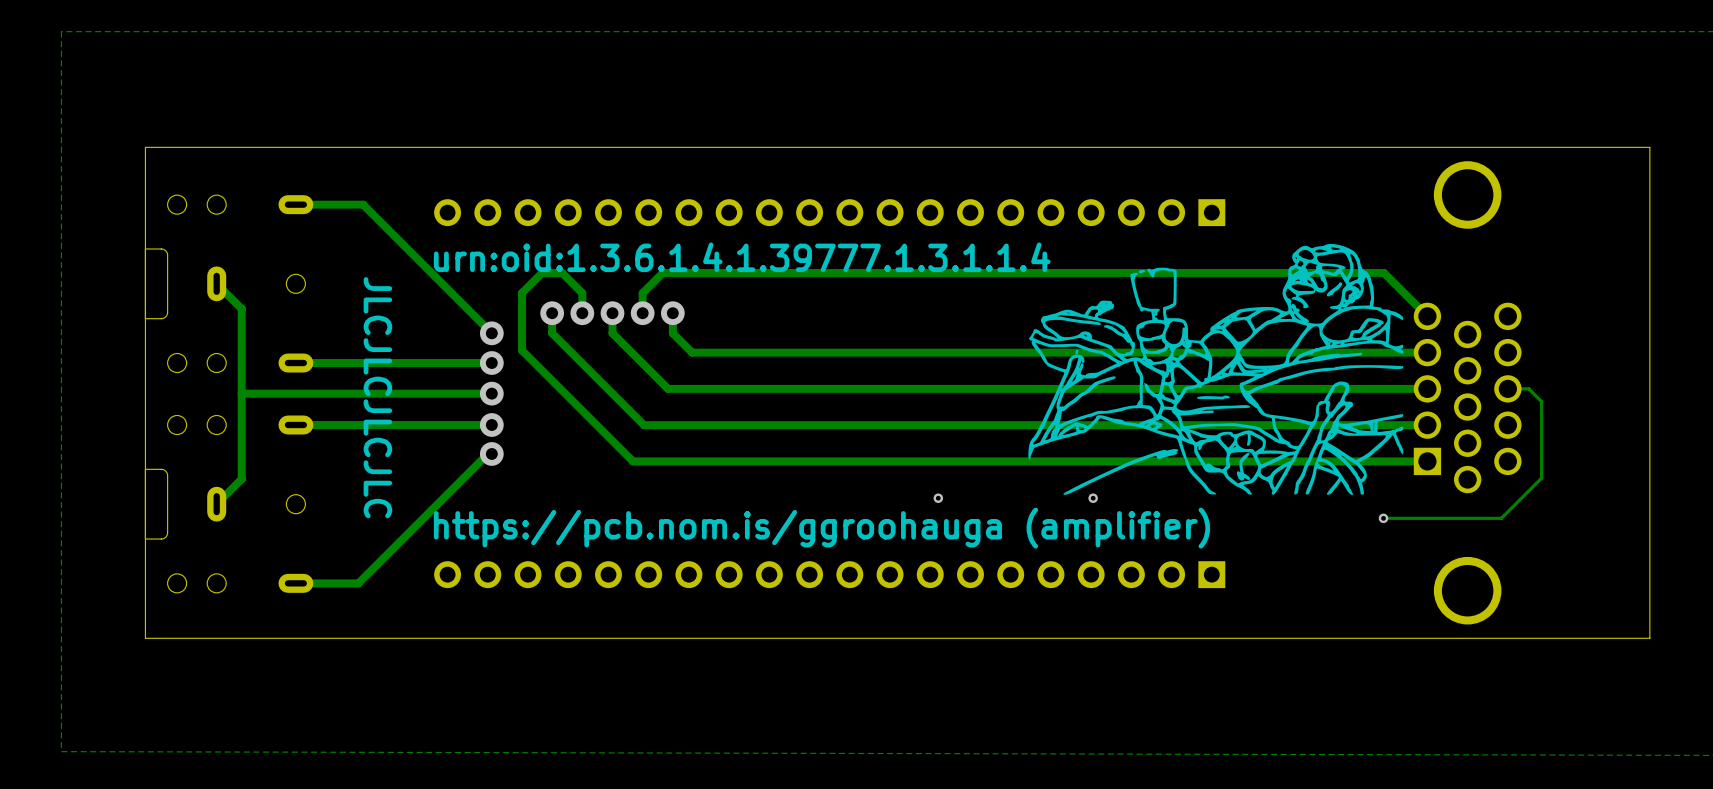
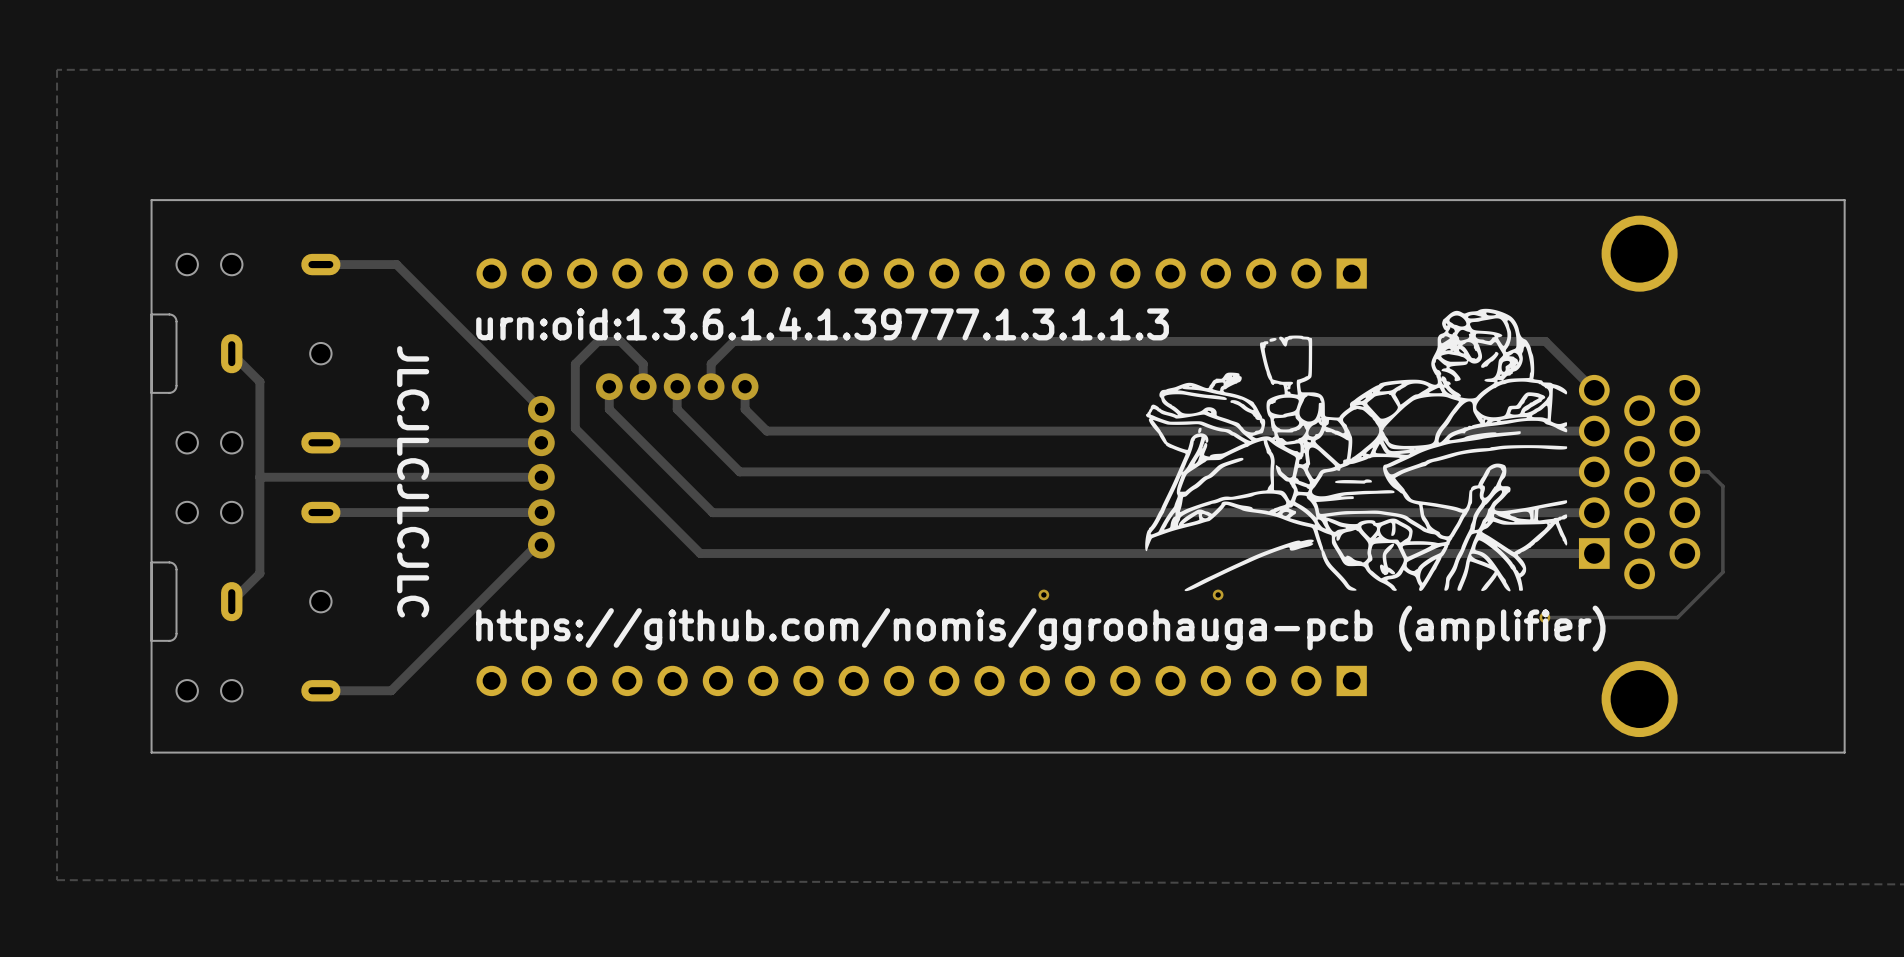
text: urn:oid:1.3.6.1.4.1.39777.1.3.1.1.4 (742, 257) -> urn:oid:1.3.6.1.4.1.39777.1.3.1.1.3 (822, 323)
text: https://pcb.nom.is/ggroohauga (amplifier) (821, 528) -> https://github.com/nomis/ggroohauga-pcb (amplifier) (1040, 628)

